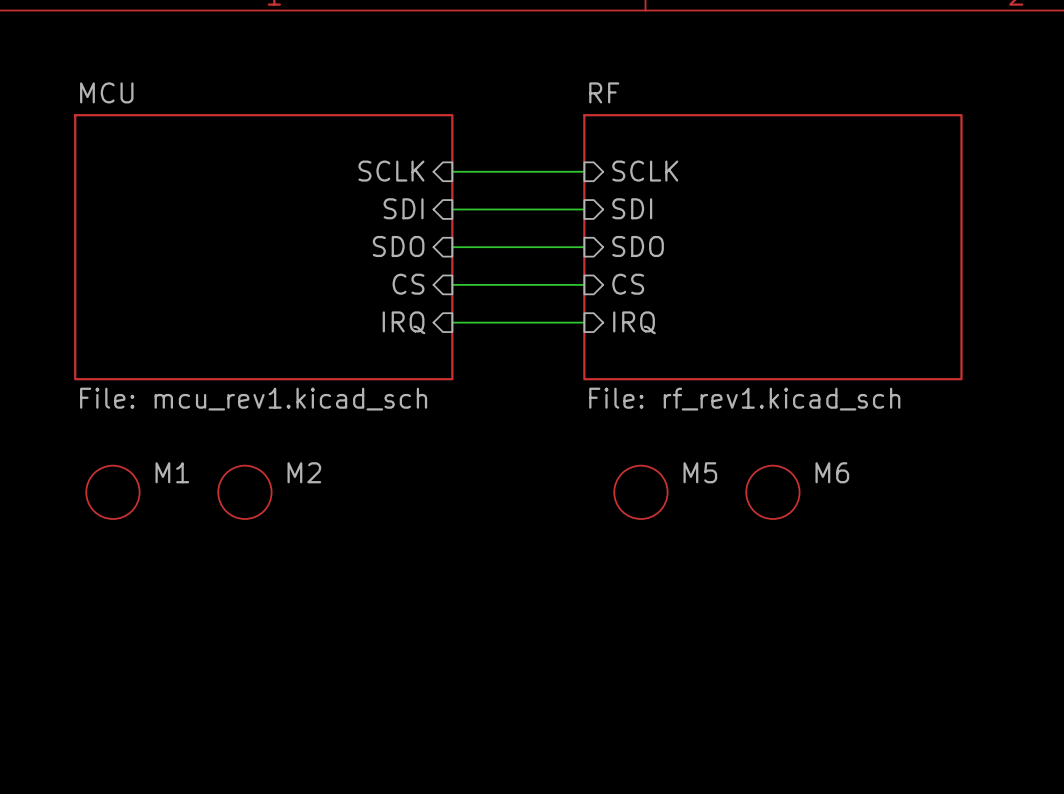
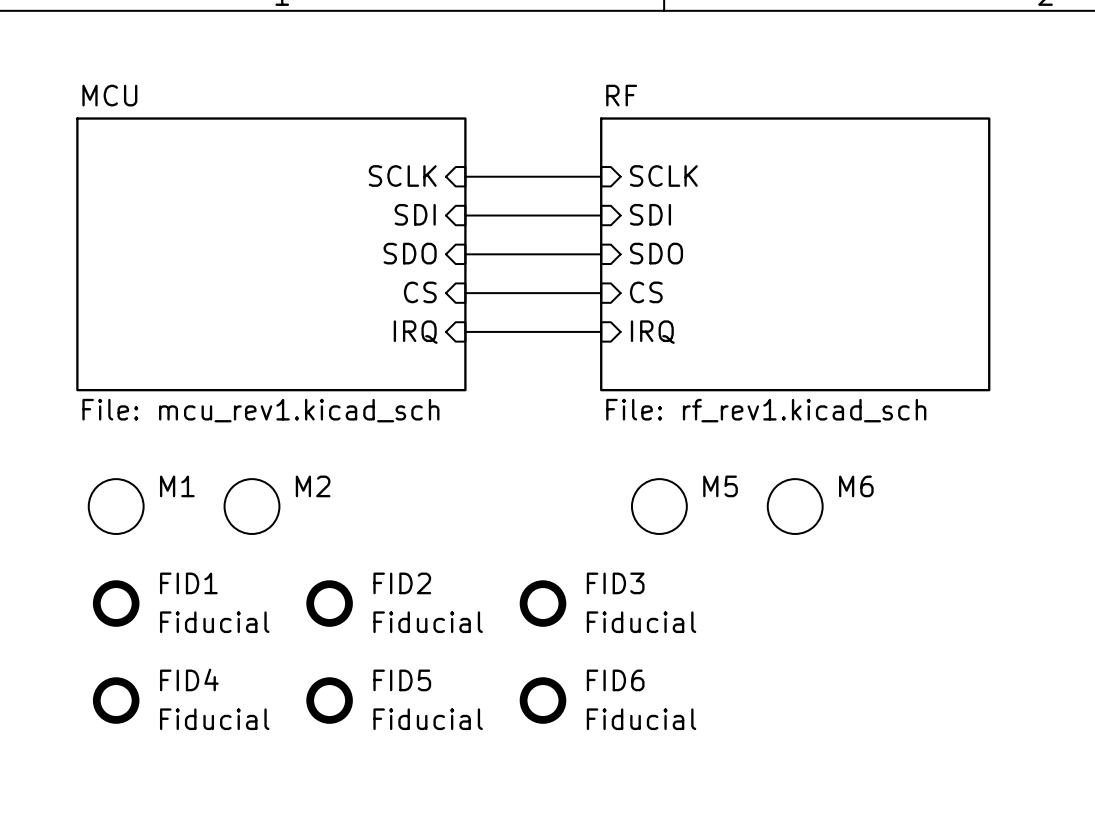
FID1: none -> Fiducial (116, 603)
FID2: none -> Fiducial (329, 603)
FID3: none -> Fiducial (543, 603)
FID4: none -> Fiducial (116, 700)
FID5: none -> Fiducial (329, 700)
FID6: none -> Fiducial (543, 700)

